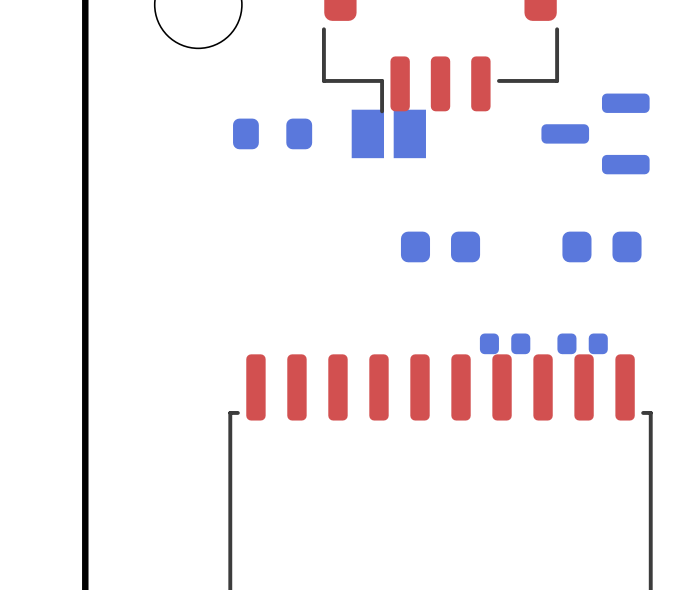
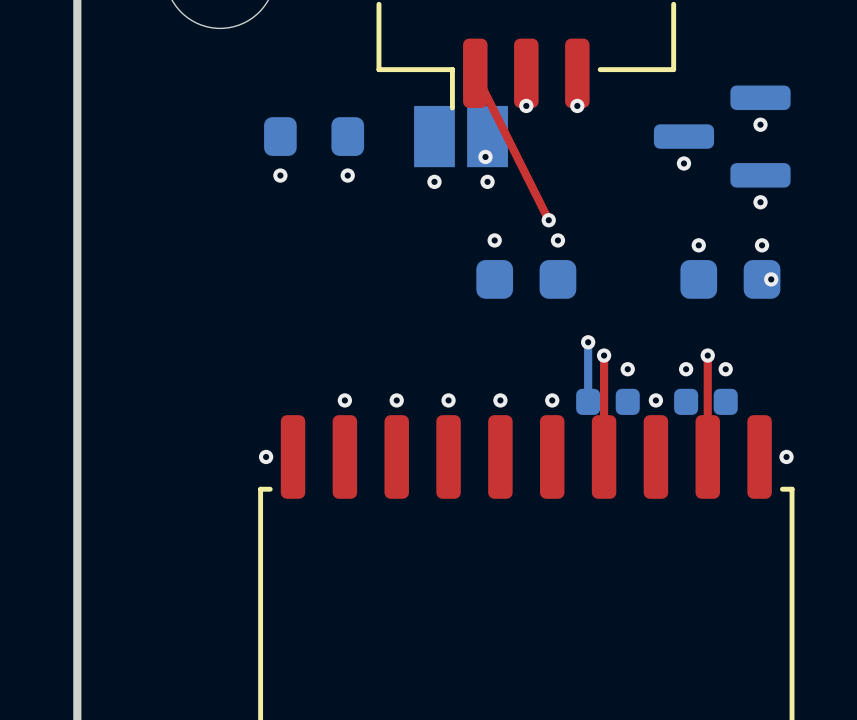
top track: none -> (475, 73) (548, 220)
via: none -> (526, 105)
via: none -> (577, 105)
via: none -> (760, 124)
via: none -> (485, 156)
via: none -> (683, 163)
via: none -> (280, 175)
via: none -> (347, 175)
via: none -> (434, 181)
via: none -> (487, 181)
via: none -> (760, 202)
via: none -> (548, 220)
via: none -> (494, 240)
via: none -> (557, 240)
via: none -> (698, 245)
via: none -> (762, 245)
via: none -> (771, 279)
bottom track: none -> (588, 342) (588, 401)
via: none -> (588, 342)
top track: none -> (604, 355) (604, 456)
via: none -> (604, 355)
top track: none -> (707, 355) (707, 456)
via: none -> (707, 355)
via: none -> (627, 369)
via: none -> (686, 369)
via: none -> (725, 369)
via: none -> (344, 400)
via: none -> (396, 400)
via: none -> (448, 400)
via: none -> (500, 400)
via: none -> (552, 400)
via: none -> (655, 400)
via: none -> (266, 456)
via: none -> (786, 456)

